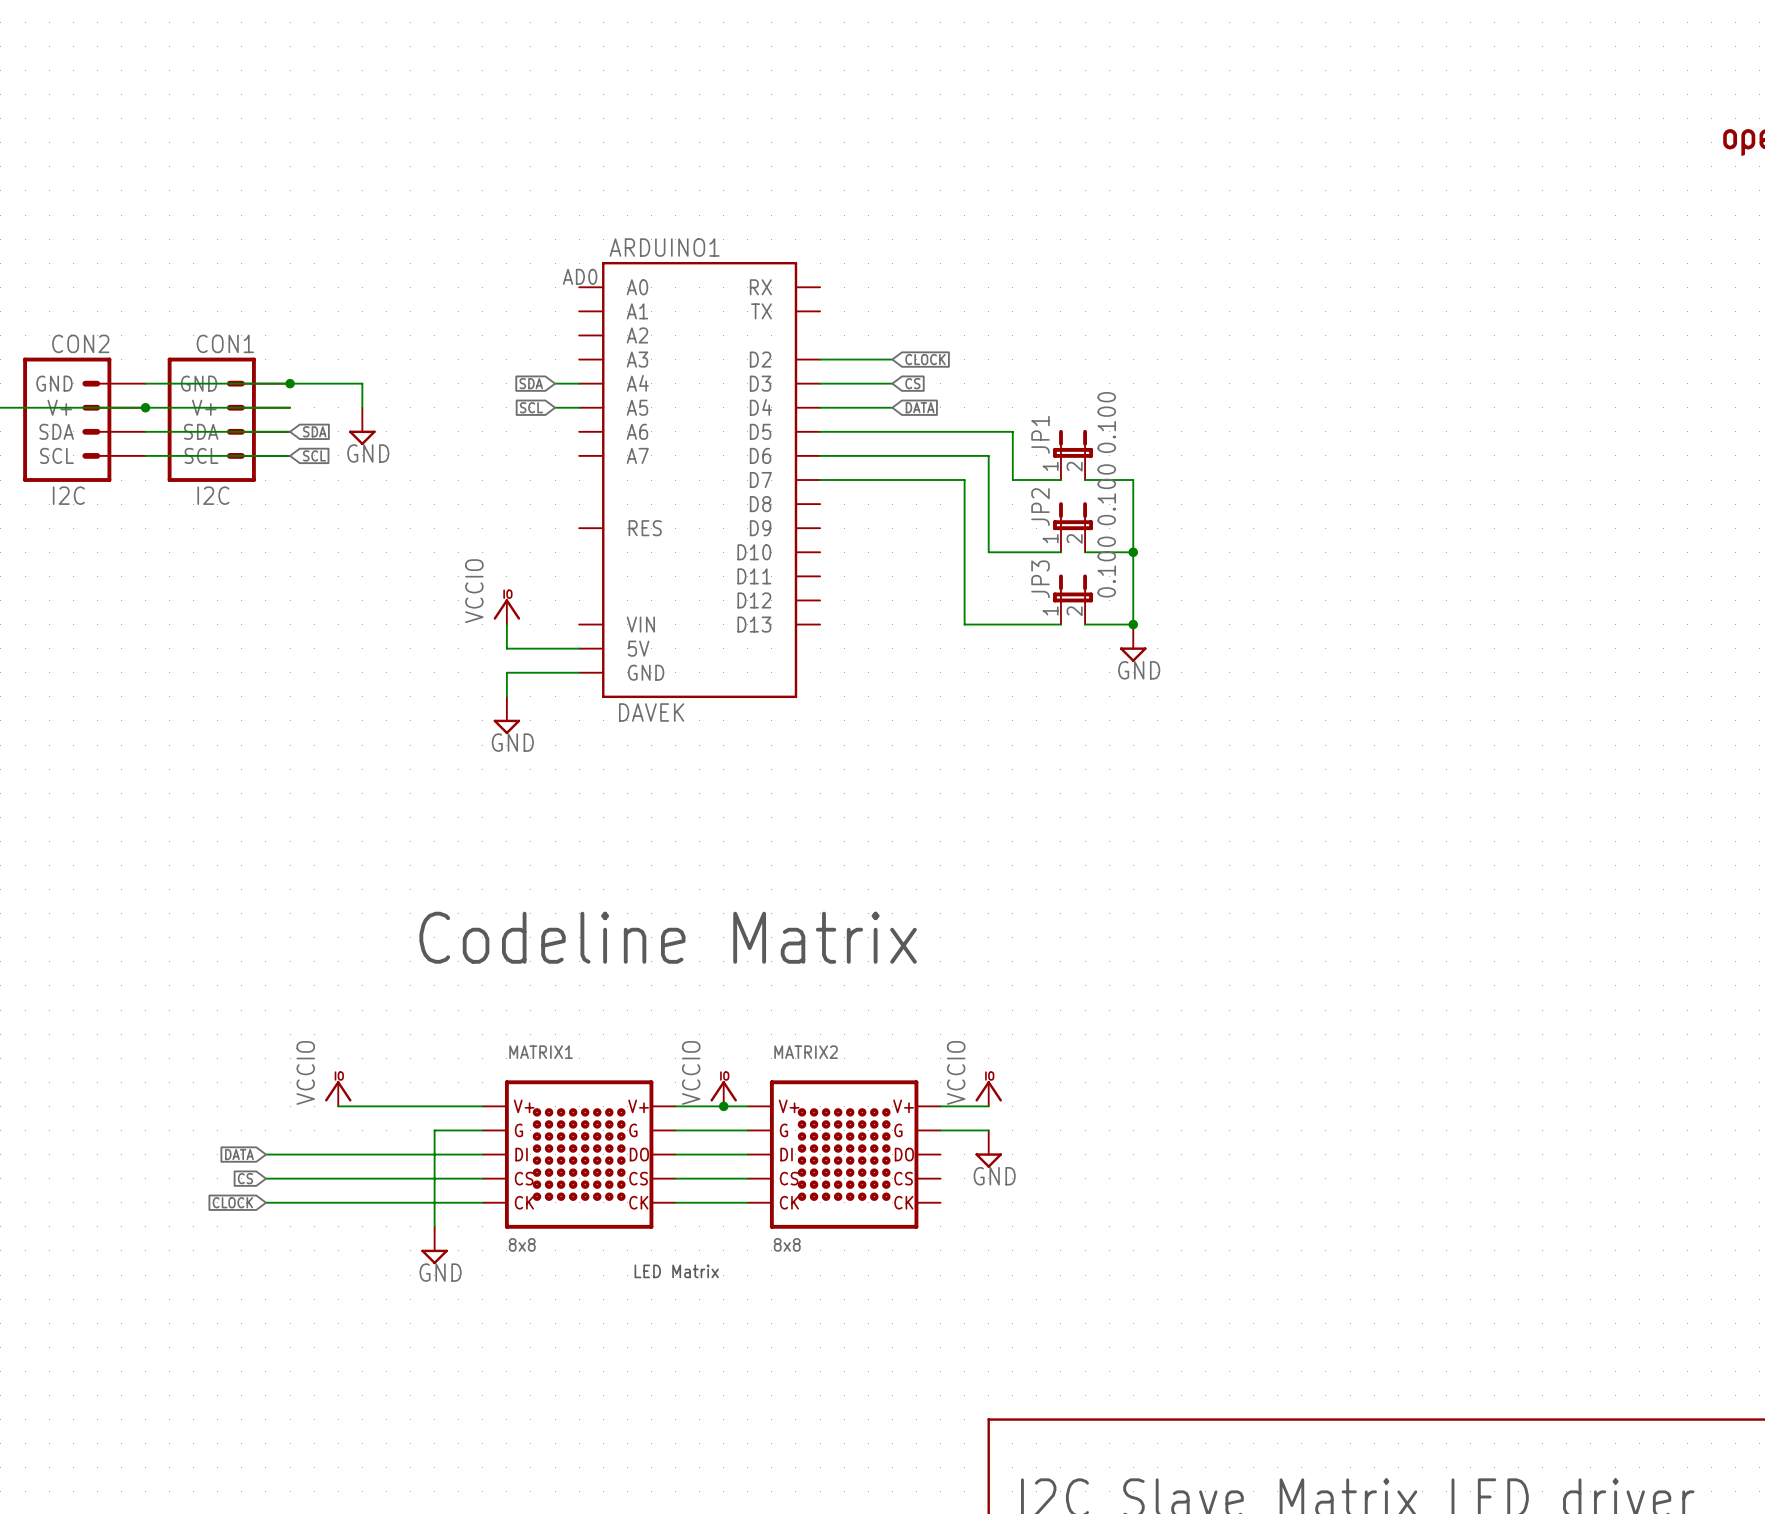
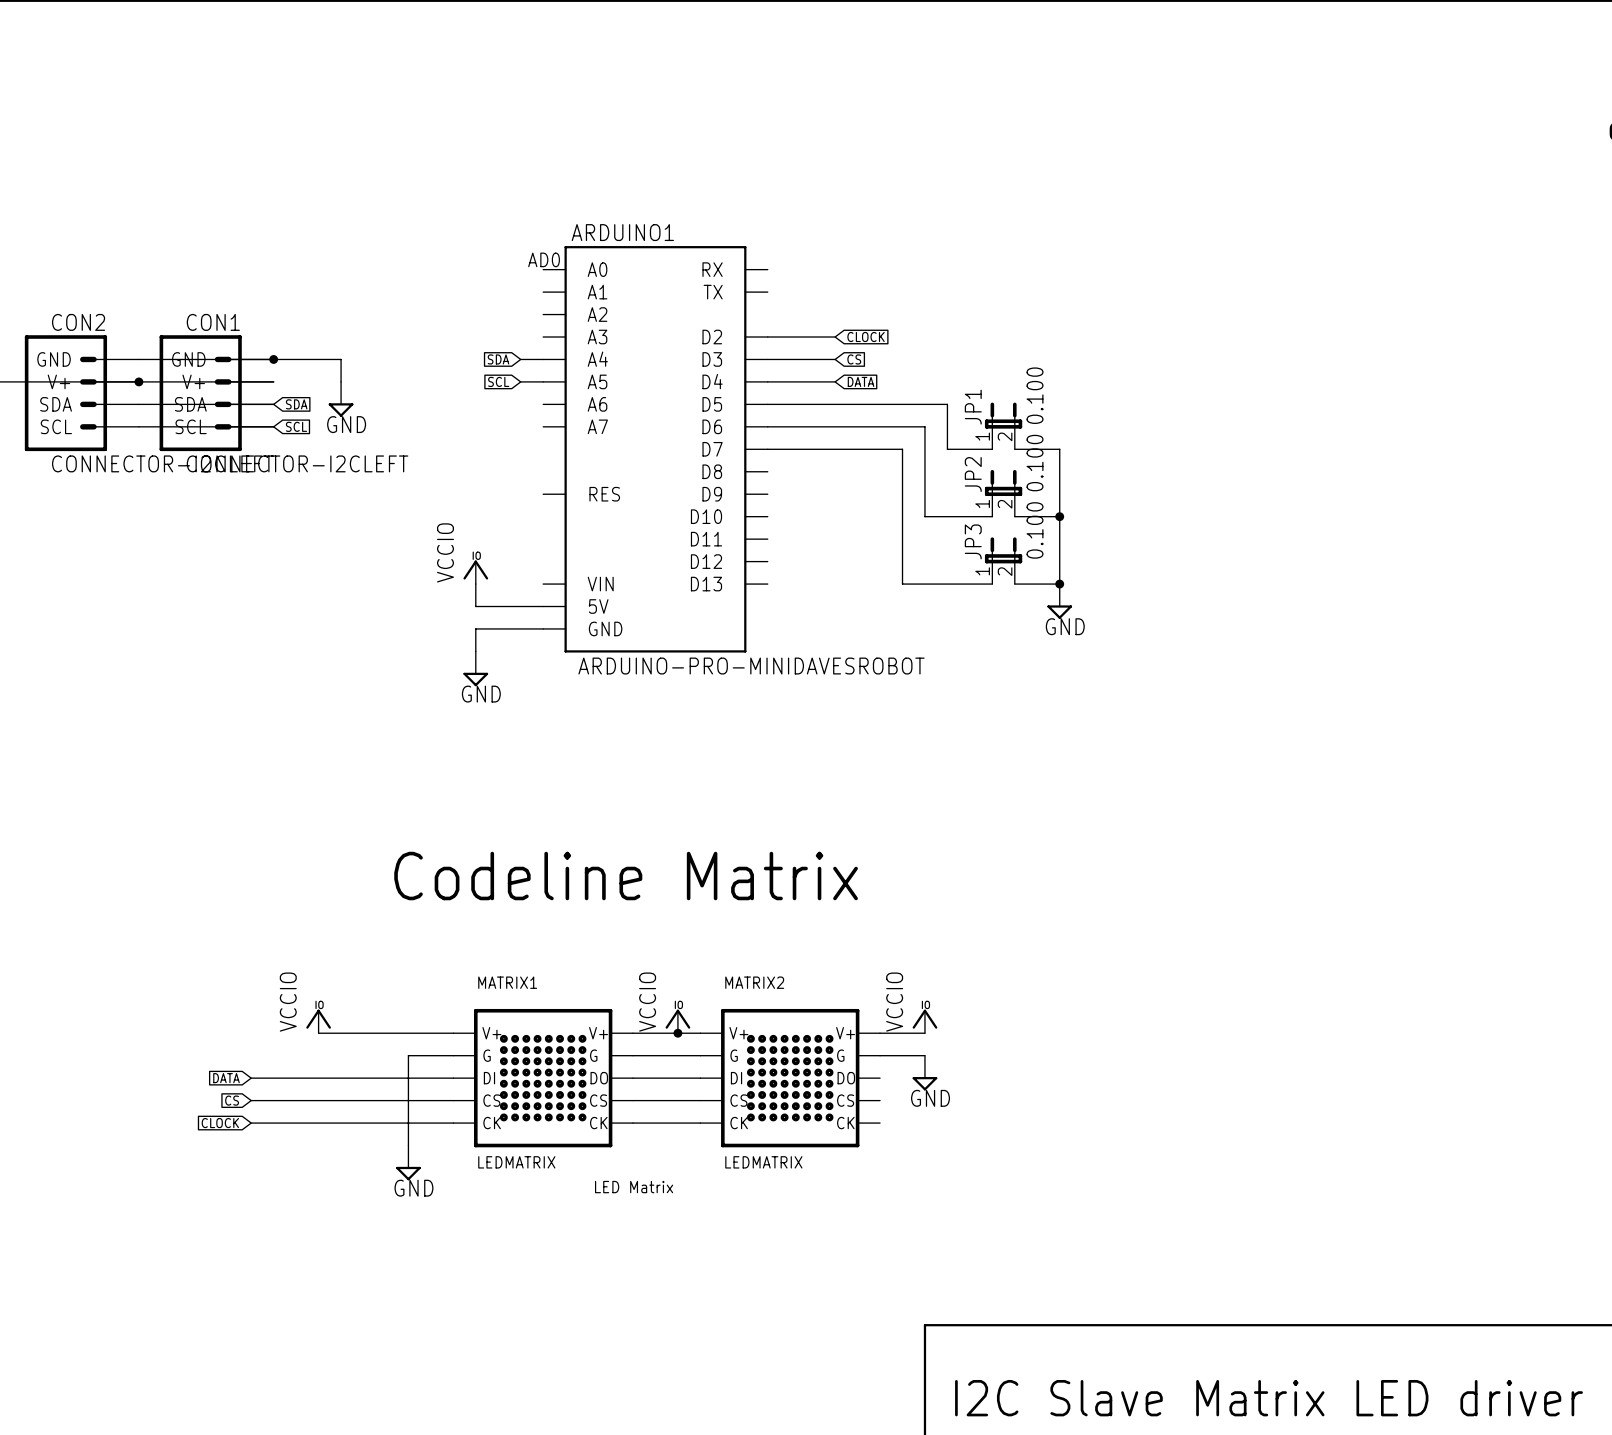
CON2 value: I2C (68, 495) -> CONNECTOR-I2CLEFT (162, 463)
CON1 value: I2C (213, 495) -> CONNECTOR-I2CLEFT (297, 463)
ARDUINO1 value: DAVEK (651, 712) -> ARDUINO-PRO-MINIDAVESROBOT (751, 666)
MATRIX1 value: 8x8 (522, 1244) -> LEDMATRIX (516, 1162)
MATRIX2 value: 8x8 (787, 1244) -> LEDMATRIX (763, 1162)

